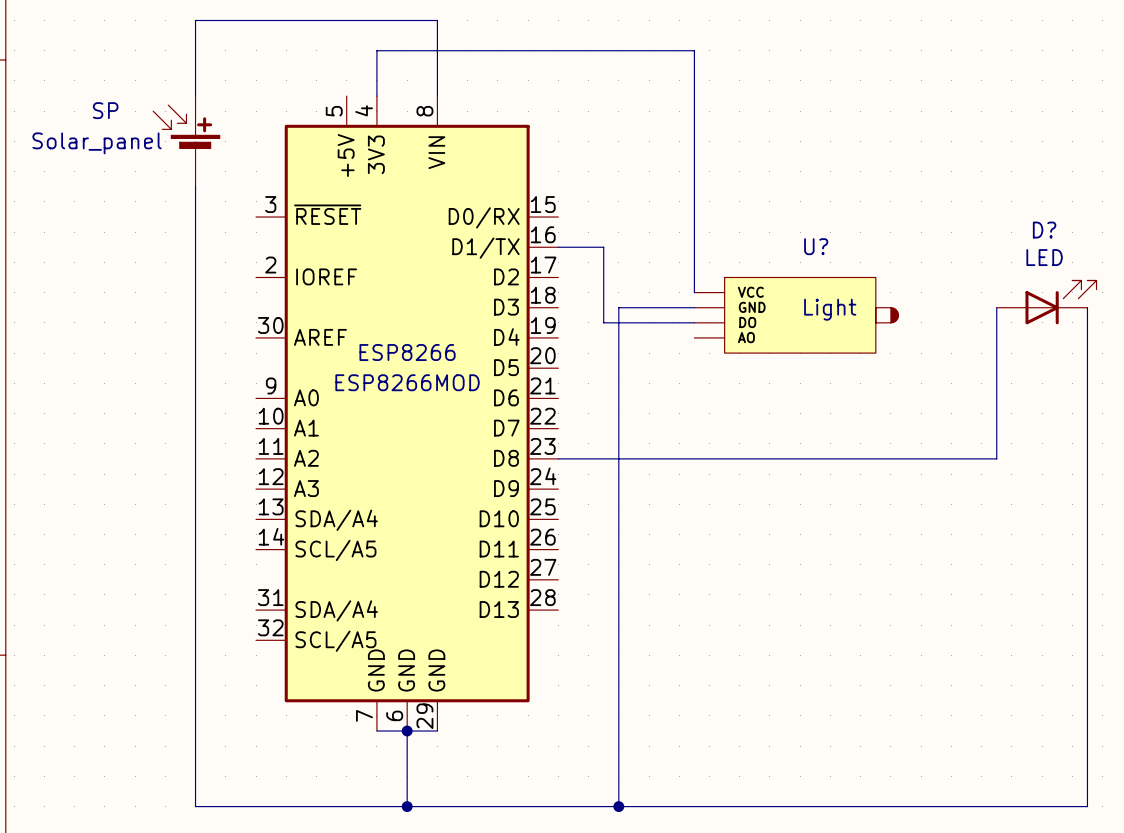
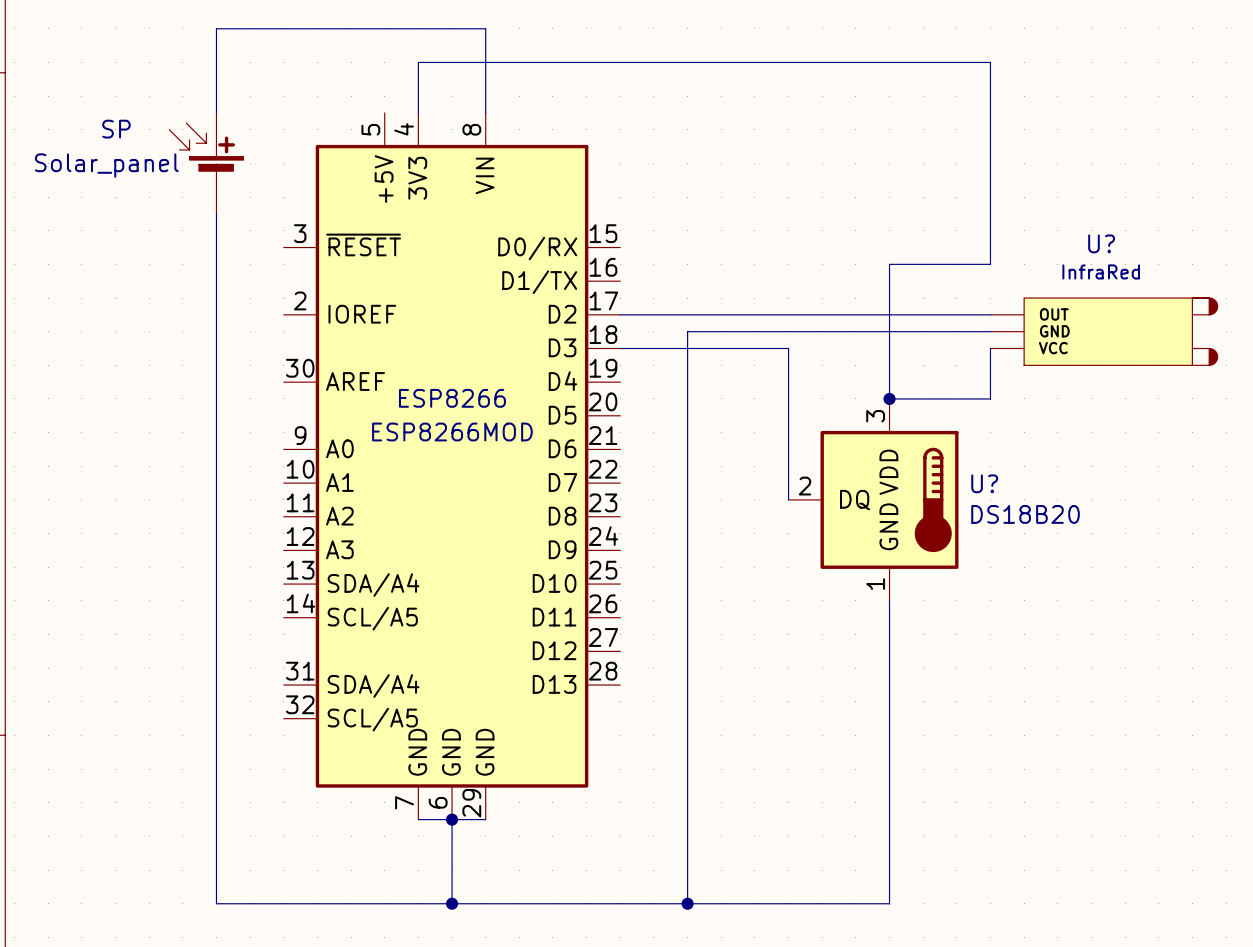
wire: (694, 50) (694, 292) -> (771, 62) (990, 62) (990, 264) (889, 264) (889, 398) (990, 398) (990, 348)
wire: (558, 247) (603, 247) (603, 322) (694, 322) -> none
wire: none -> (620, 314) (990, 314)
wire: none -> (990, 331) (687, 331) (687, 348) (620, 348)
U?: none -> InfraRed (1104, 331)
D?: LED (1046, 302) -> none
wire: none -> (771, 348) (788, 348) (788, 499)
wire: (996, 307) (996, 458) (558, 458) -> none
wire: (1087, 307) (1087, 806) (800, 806) -> (889, 600) (889, 903)
U?: Light (796, 315) -> none
junction: none -> (889, 398)
U?: none -> DS18B20 (873, 499)

